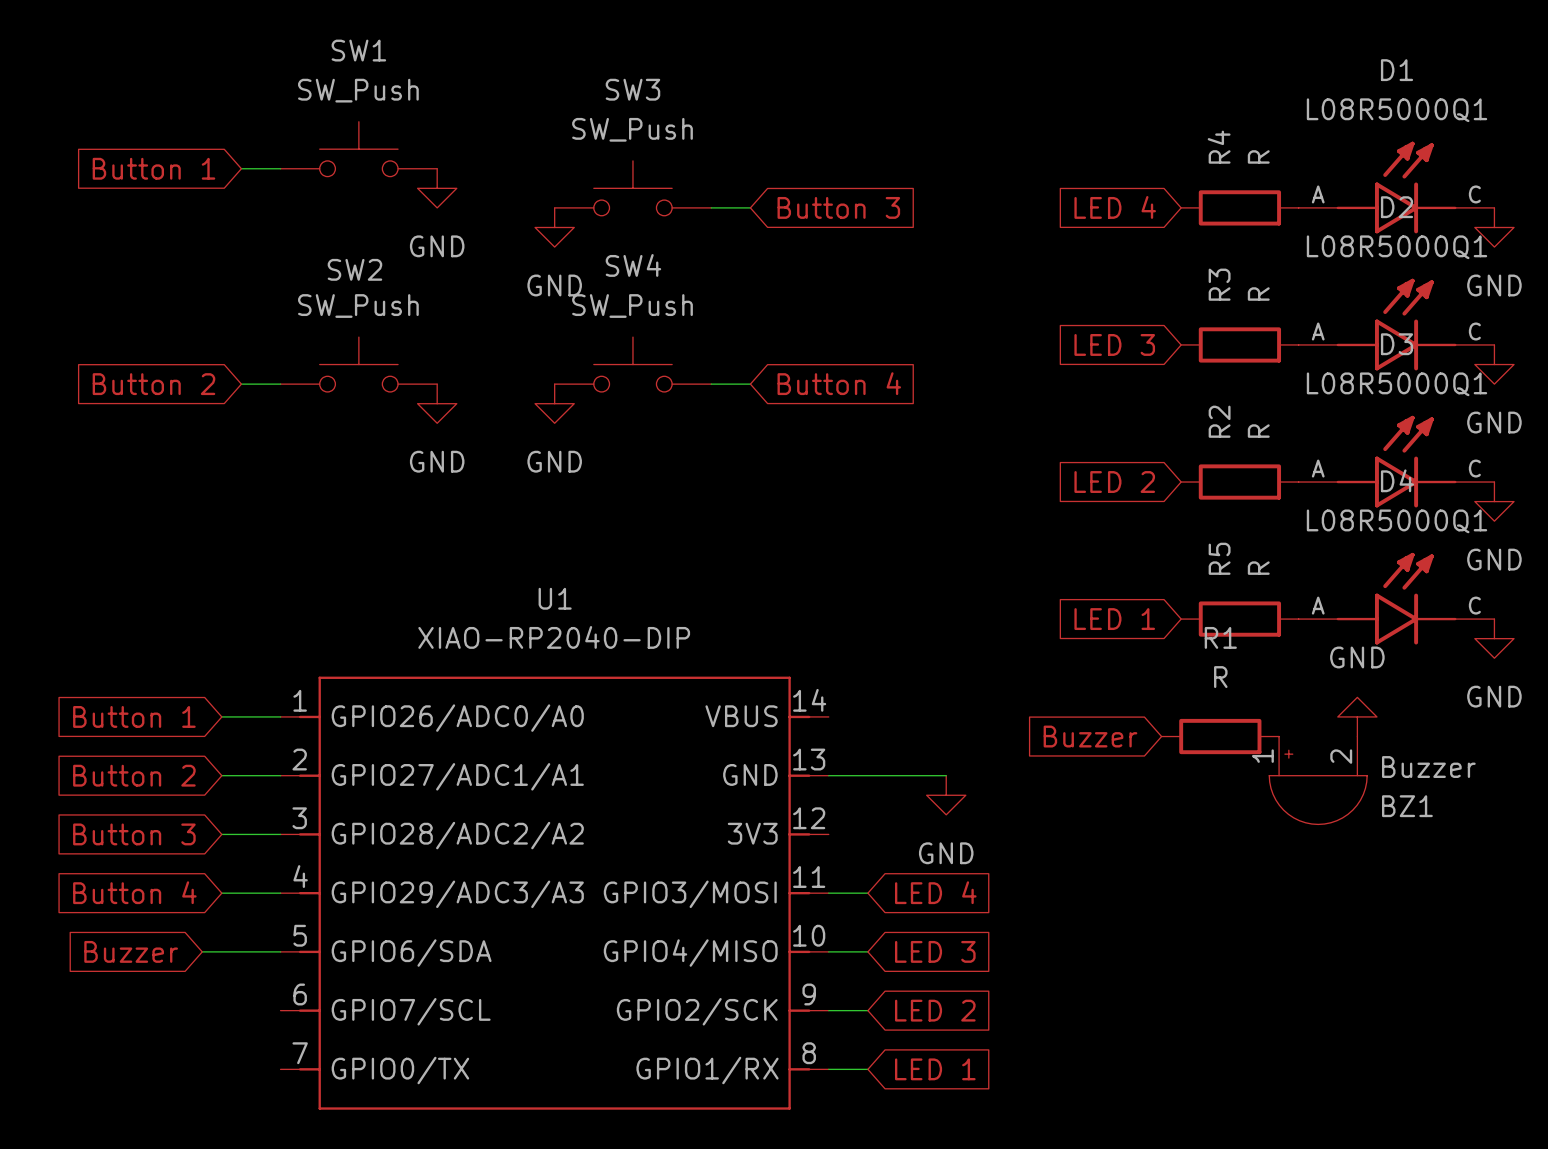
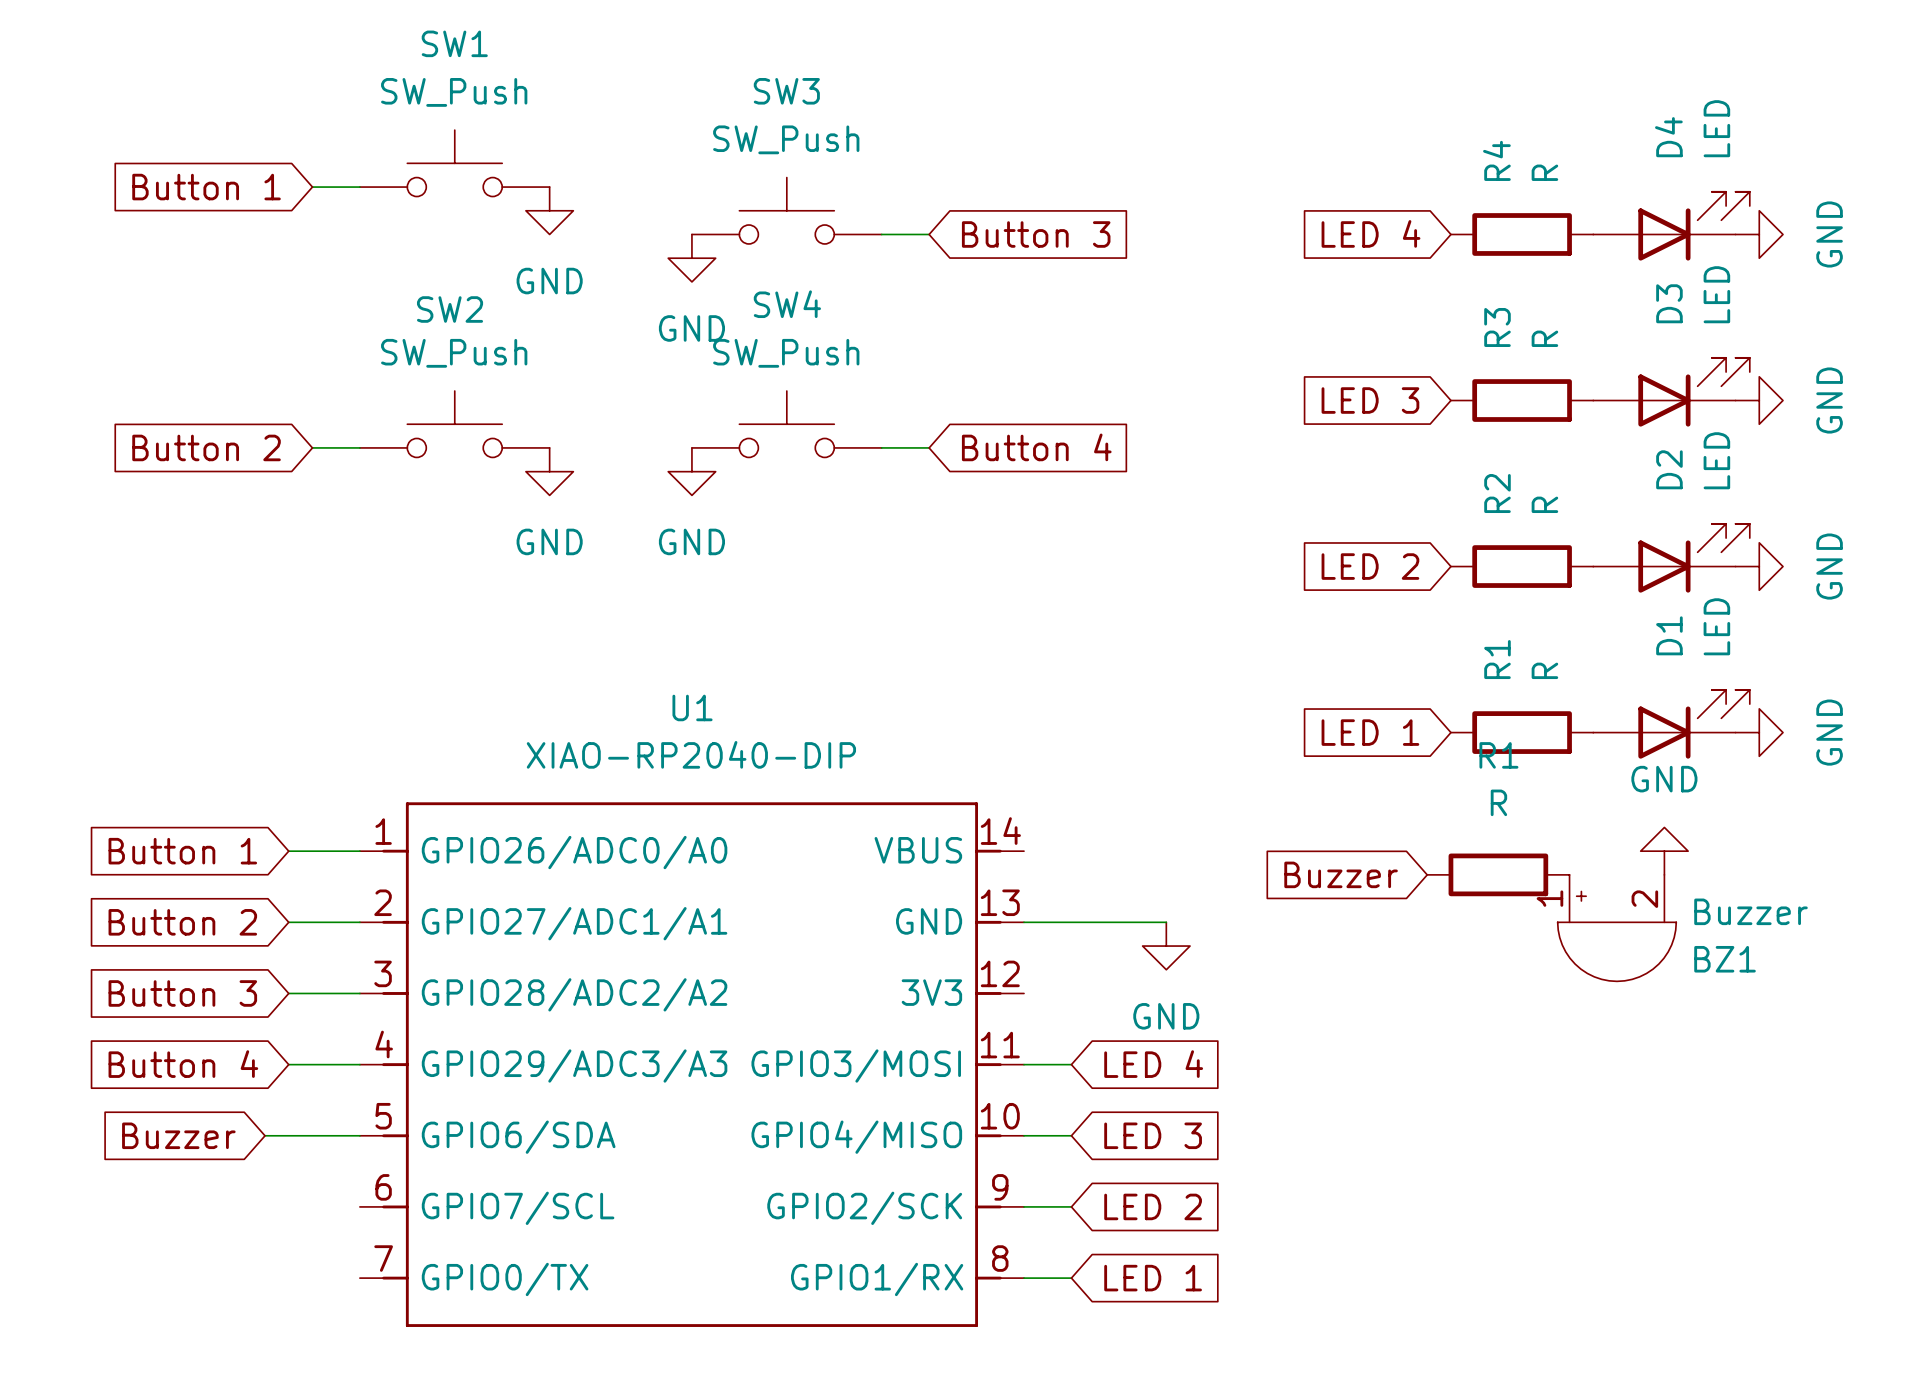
D1 name position: D1 (1397, 70) -> D1 (1669, 635)
D1 value: L08R5000Q1 (1397, 110) -> LED (1716, 626)
D1 symbol: [1298, 141, 1495, 234] -> [1593, 689, 1750, 759]
D2 name position: D2 (1397, 207) -> D2 (1669, 469)
power symbol rotation: 0° (1494, 227) -> 90° counterclockwise (1759, 234)
power symbol position: GND (1494, 227) -> GND (1759, 234)
D2 value: L08R5000Q1 (1397, 247) -> LED (1716, 460)
D2 symbol: [1298, 278, 1495, 371] -> [1593, 523, 1750, 593]
D3 name position: D3 (1397, 344) -> D3 (1669, 303)
power symbol rotation: 0° (1494, 364) -> 90° counterclockwise (1759, 400)
power symbol position: GND (1494, 364) -> GND (1759, 400)
D3 value: L08R5000Q1 (1397, 384) -> LED (1716, 294)
D3 symbol: [1298, 415, 1495, 508] -> [1593, 357, 1750, 427]
D4 name position: D4 (1397, 480) -> D4 (1668, 137)
power symbol rotation: 0° (1494, 501) -> 90° counterclockwise (1759, 566)
power symbol position: GND (1494, 501) -> GND (1759, 566)
D4 value: L08R5000Q1 (1397, 521) -> LED (1716, 128)
D4 symbol: [1298, 552, 1495, 645] -> [1593, 191, 1750, 261]
R5 name: R5 (1219, 558) -> R1 (1497, 659)
power symbol rotation: 0° (1494, 638) -> 90° counterclockwise (1759, 732)
power symbol position: GND (1494, 638) -> GND (1759, 732)

